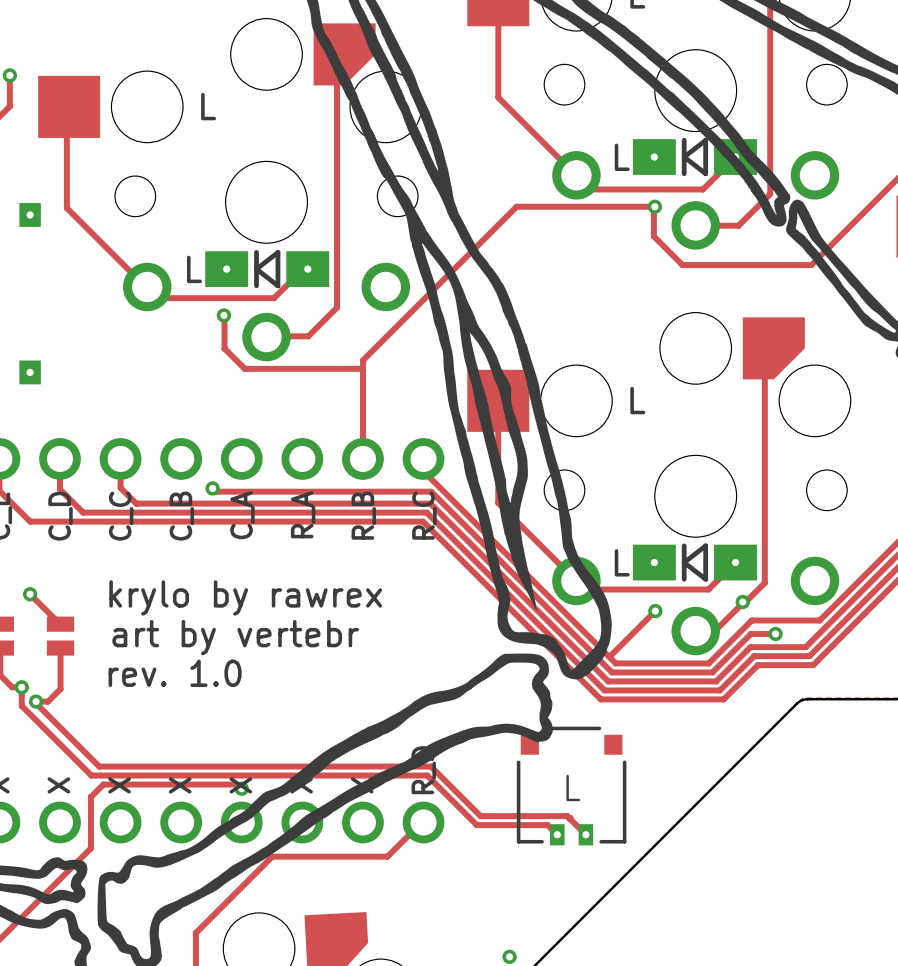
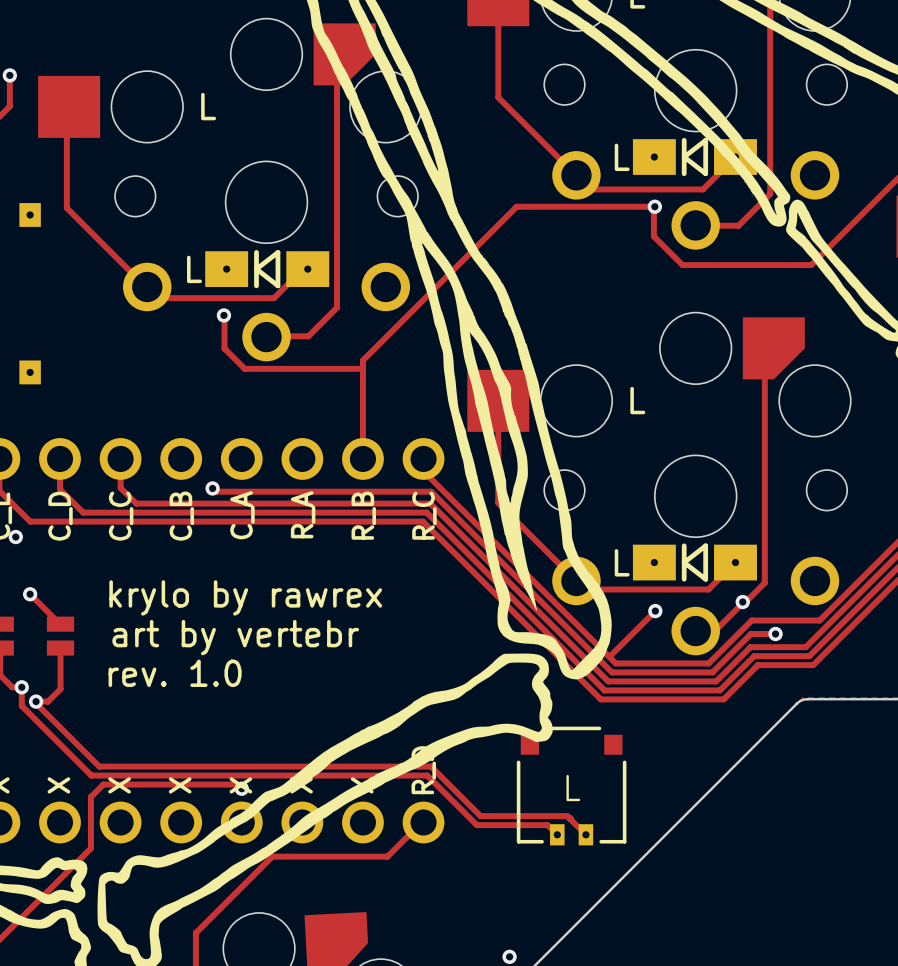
via: none -> (15, 537)

